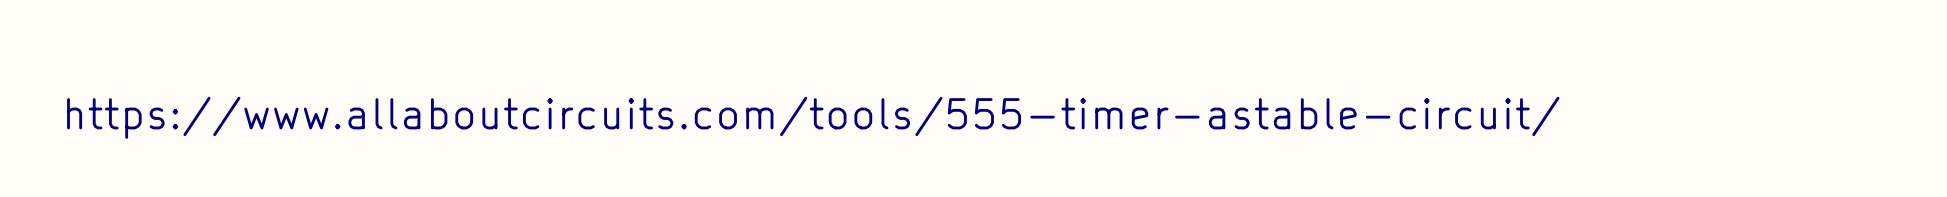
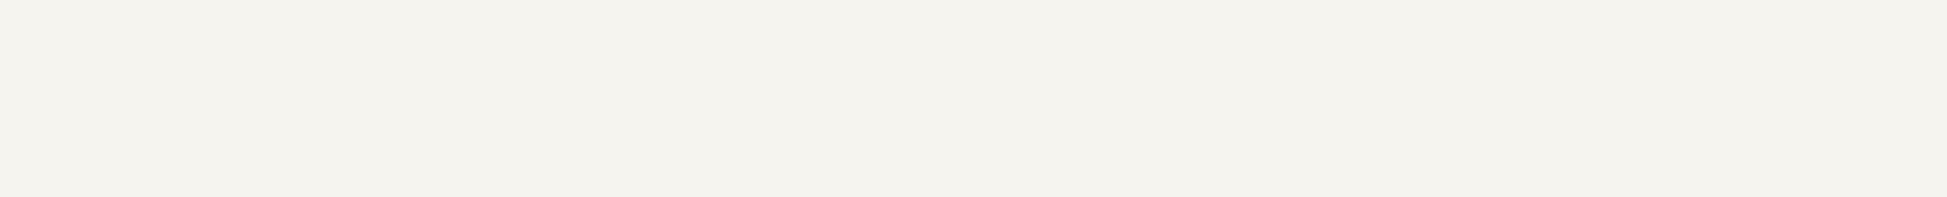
text: https://www.allaboutcircuits.com/tools/555-timer-astable-circuit/ (813, 117) -> none

